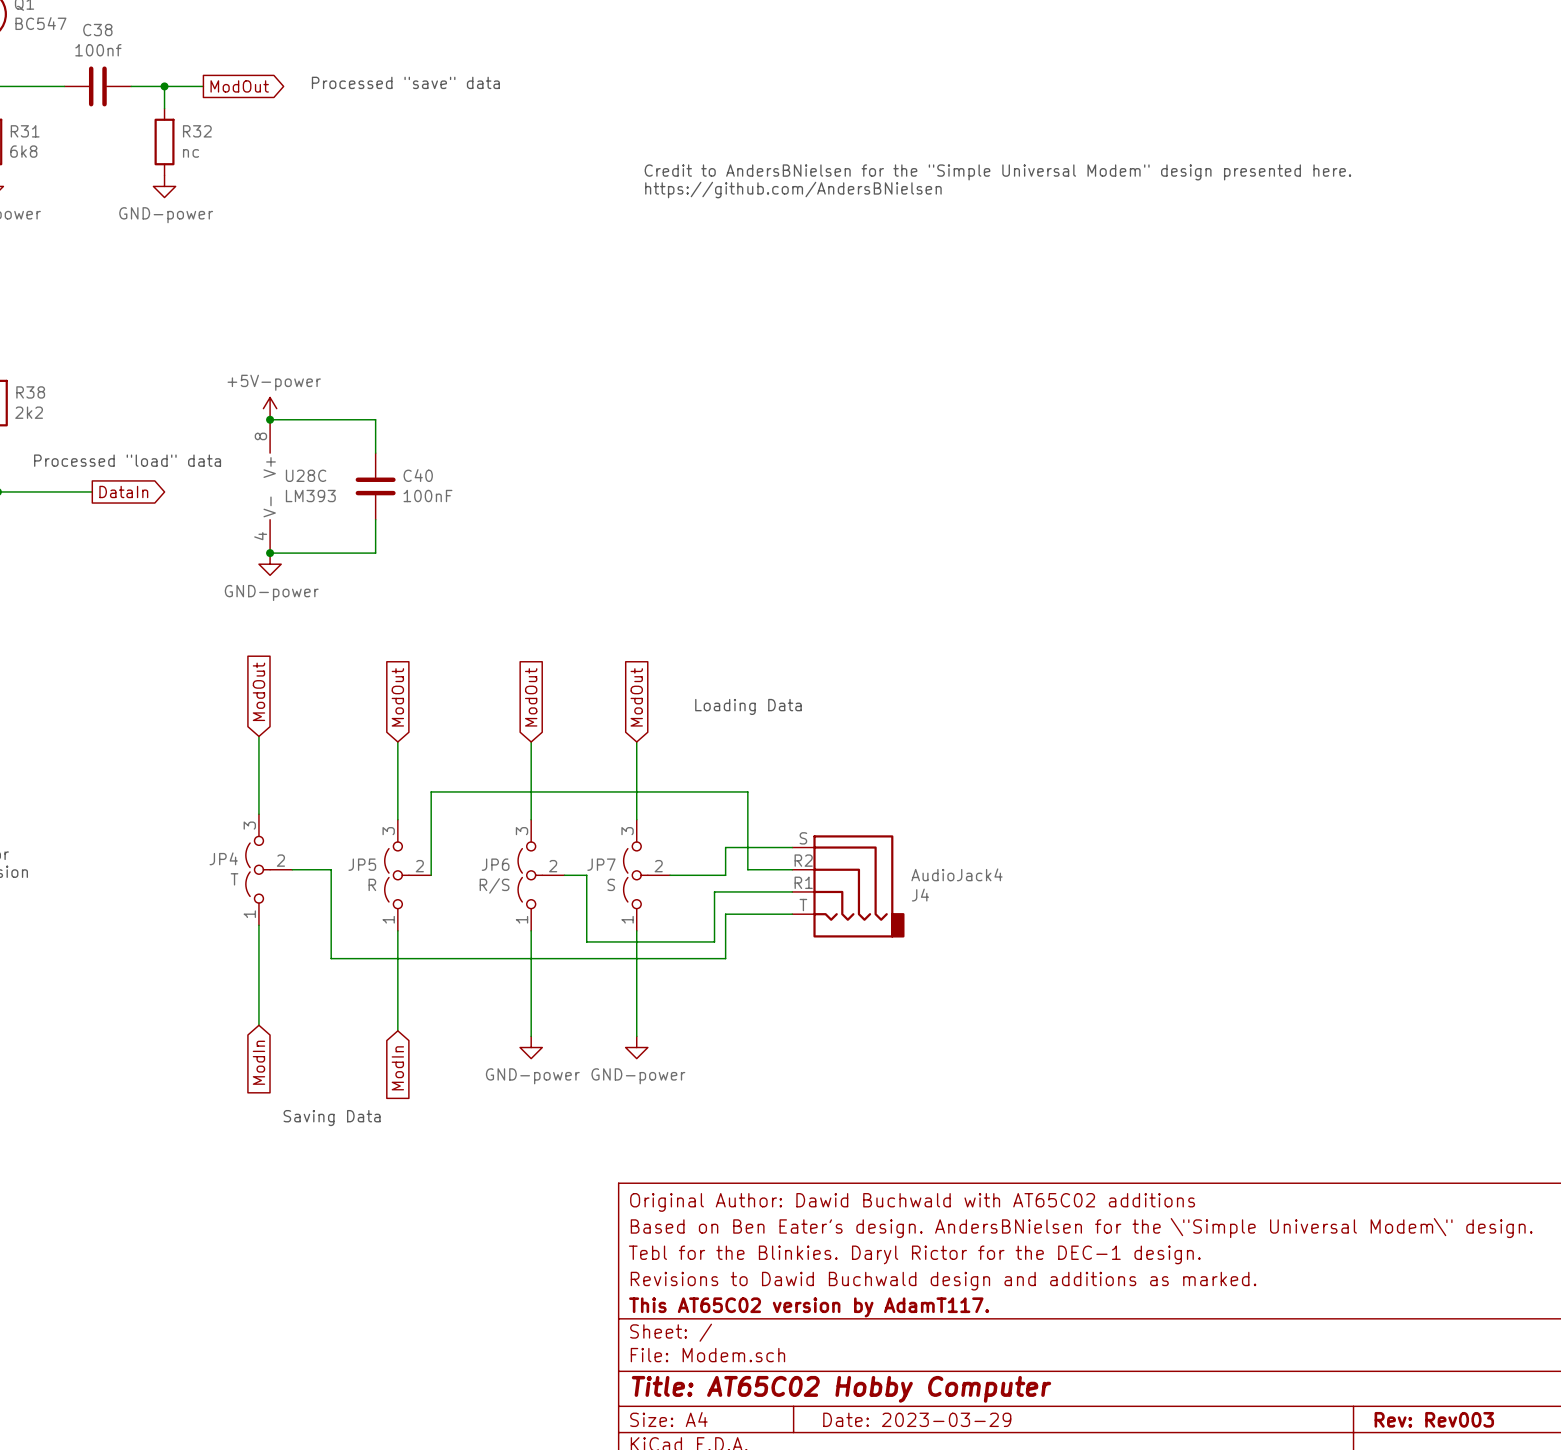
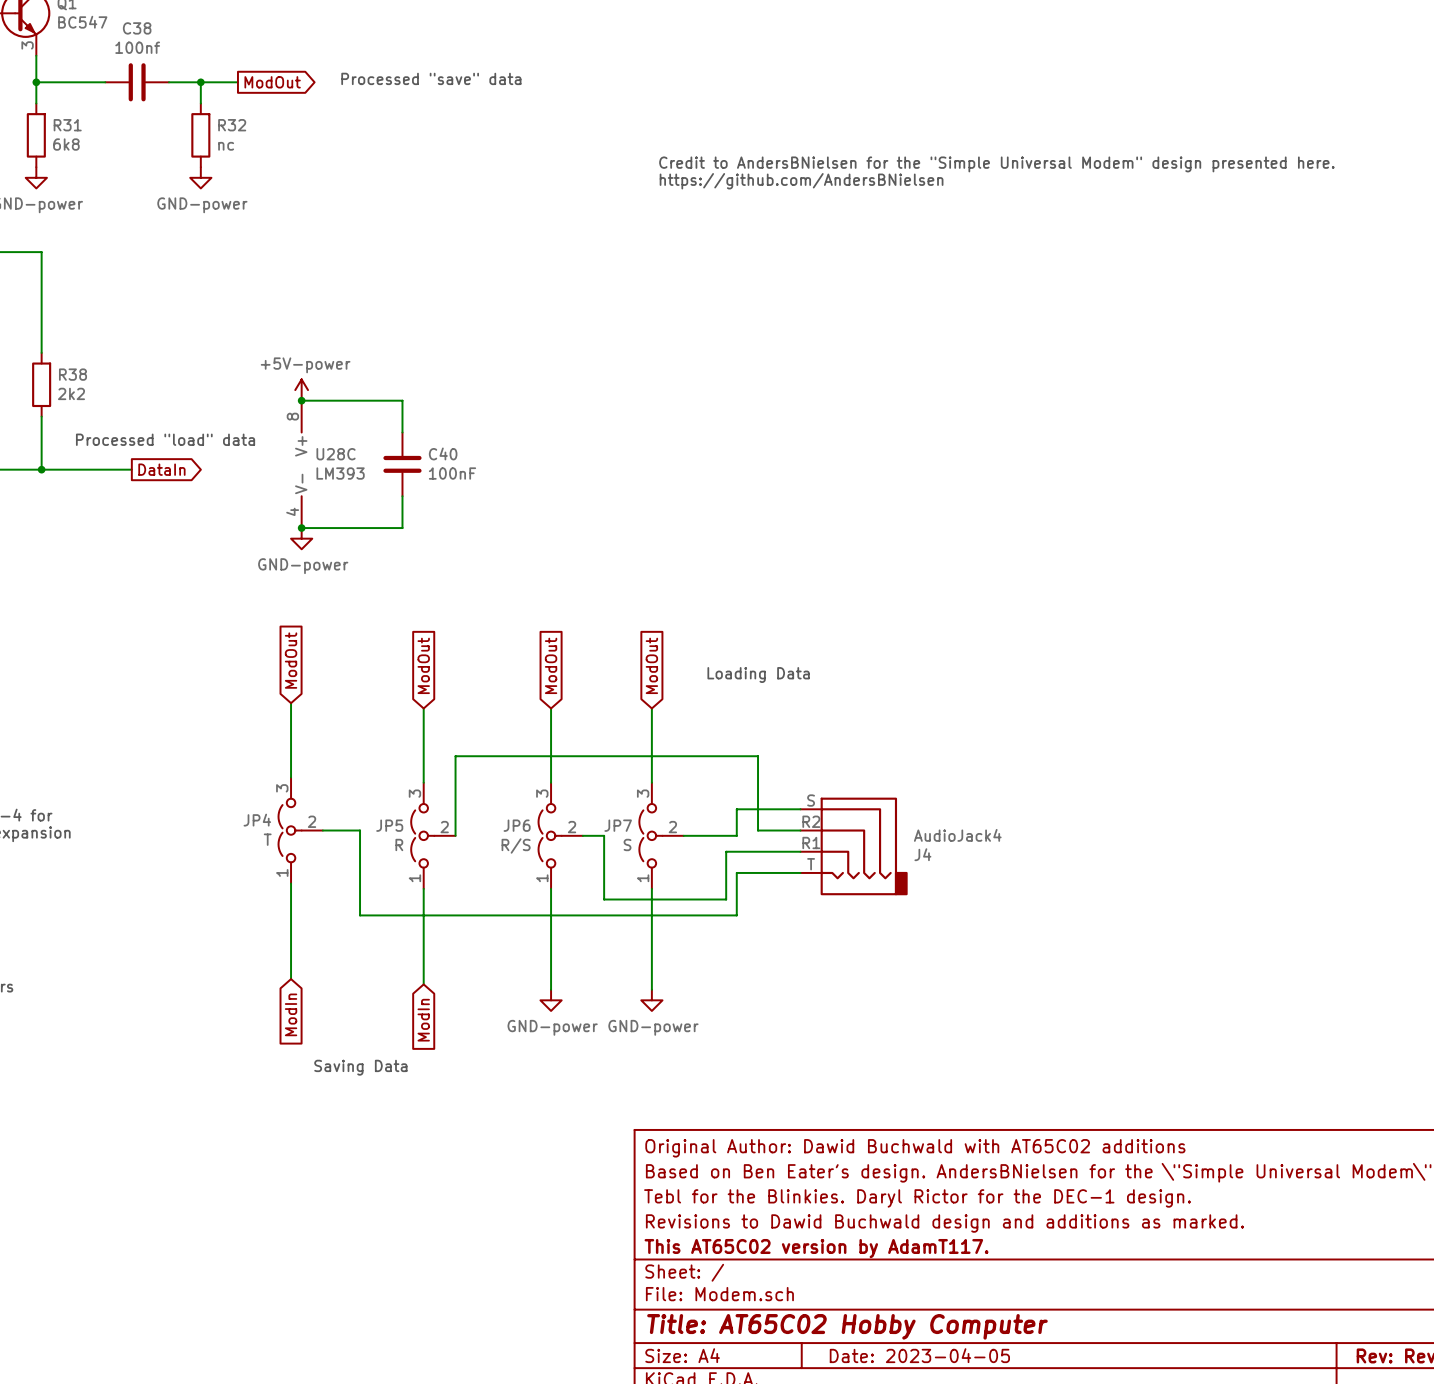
title block: Date: 2023-03-29 (917, 1419) -> Date: 2023-04-05 (919, 1355)

